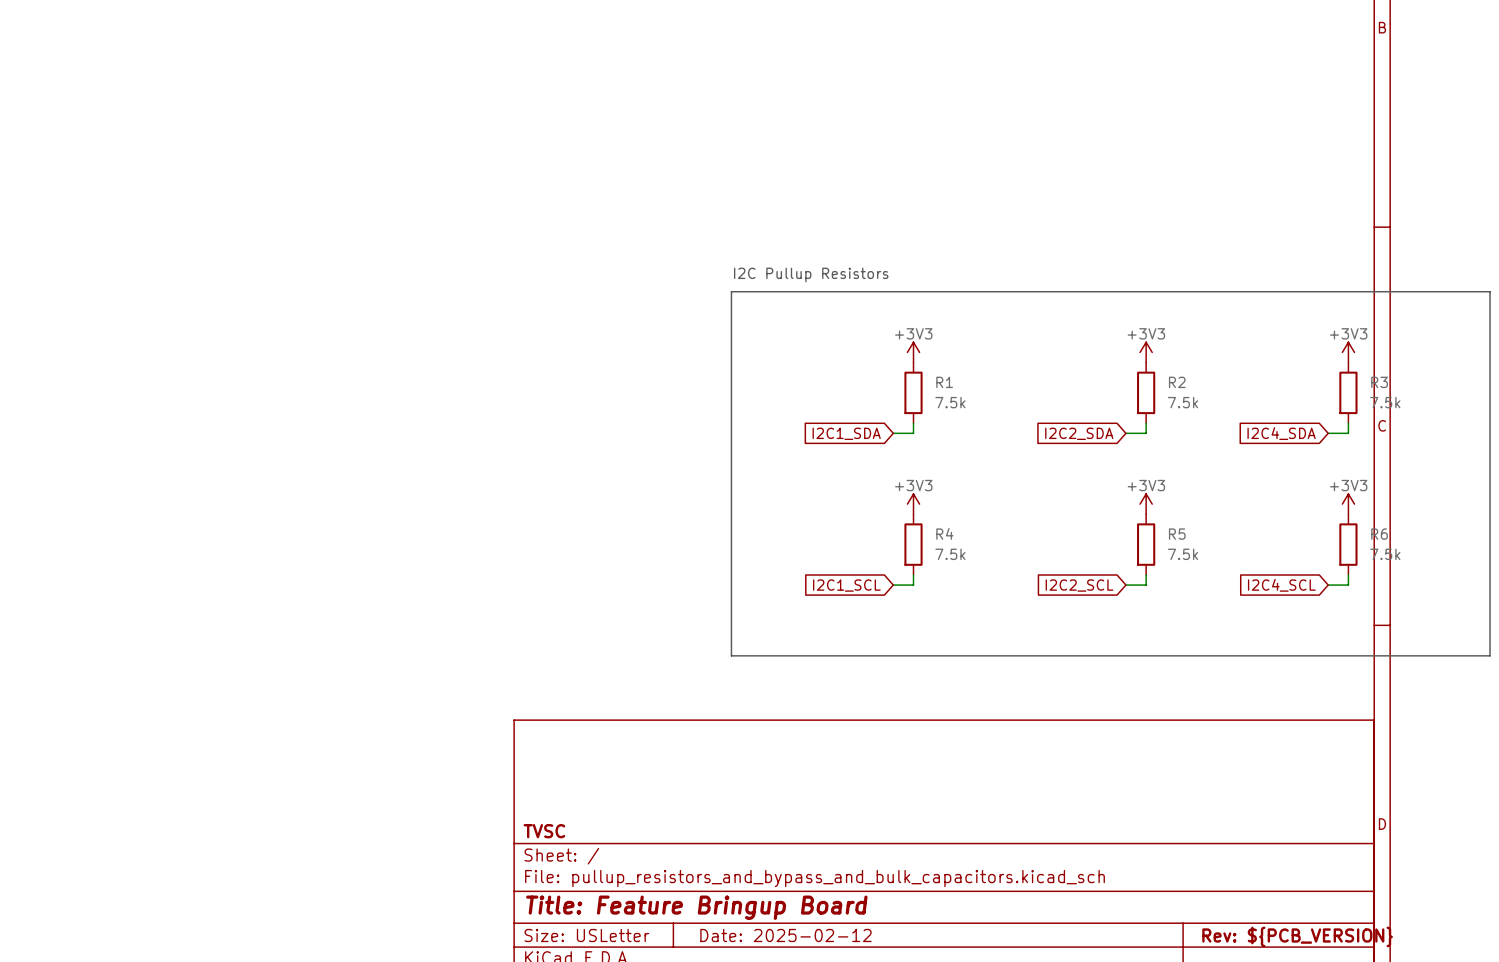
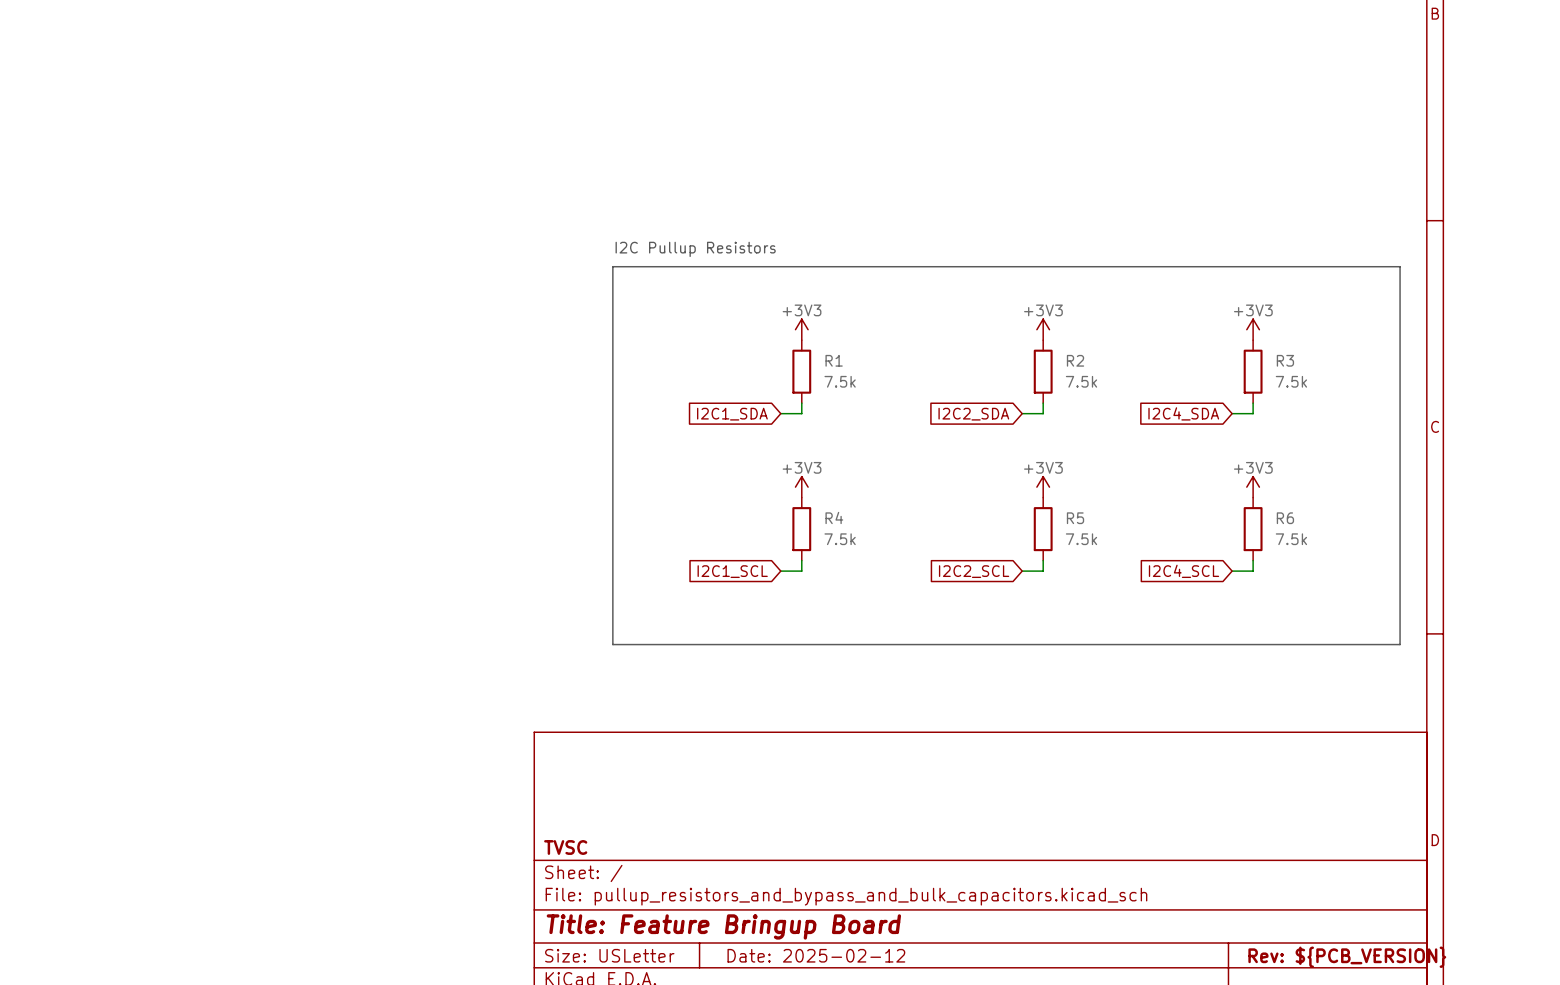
text position: I2C Pullup Resistors (811, 275) -> I2C Pullup Resistors (695, 249)
line: (731, 291) (1490, 291) (1490, 655) (731, 655) (731, 291) -> (612, 266) (1400, 266) (1400, 644) (612, 644) (612, 266)
power symbol: none -> +3V3 (801, 329)
power symbol: none -> +3V3 (1043, 329)
power symbol: +3V3 (913, 352) -> none
power symbol position: +3V3 (1146, 352) -> +3V3 (1253, 329)
power symbol: +3V3 (1348, 352) -> none
R1 position: (913, 392) -> (801, 371)
R2 position: (1146, 392) -> (1043, 371)
R3 position: (1348, 392) -> (1253, 371)
wire: (913, 423) (913, 433) (893, 433) -> (801, 403) (801, 413) (780, 413)
wire: (1146, 423) (1146, 433) (1125, 433) -> (1043, 403) (1043, 413) (1022, 413)
wire: (1348, 423) (1348, 433) (1328, 433) -> (1253, 403) (1253, 413) (1232, 413)
global label position: I2C1_SDA (846, 433) -> I2C1_SDA (732, 414)
global label position: I2C2_SDA (1079, 433) -> I2C2_SDA (973, 414)
global label position: I2C4_SDA (1281, 433) -> I2C4_SDA (1183, 413)
power symbol: none -> +3V3 (801, 487)
power symbol: none -> +3V3 (1043, 487)
power symbol: +3V3 (913, 504) -> none
power symbol position: +3V3 (1146, 504) -> +3V3 (1253, 487)
power symbol: +3V3 (1348, 504) -> none
R4 position: (913, 544) -> (801, 529)
R5 position: (1146, 544) -> (1043, 529)
R6 position: (1348, 544) -> (1253, 529)
wire: (913, 574) (913, 585) (893, 585) -> (801, 560) (801, 571) (780, 571)
wire: (1146, 574) (1146, 585) (1125, 585) -> (1043, 560) (1043, 571) (1022, 571)
wire: (1348, 574) (1348, 585) (1328, 585) -> (1253, 560) (1253, 571) (1232, 571)
global label position: I2C1_SCL (846, 585) -> I2C1_SCL (732, 571)
global label position: I2C2_SCL (1079, 585) -> I2C2_SCL (974, 571)
global label position: I2C4_SCL (1281, 585) -> I2C4_SCL (1183, 571)

